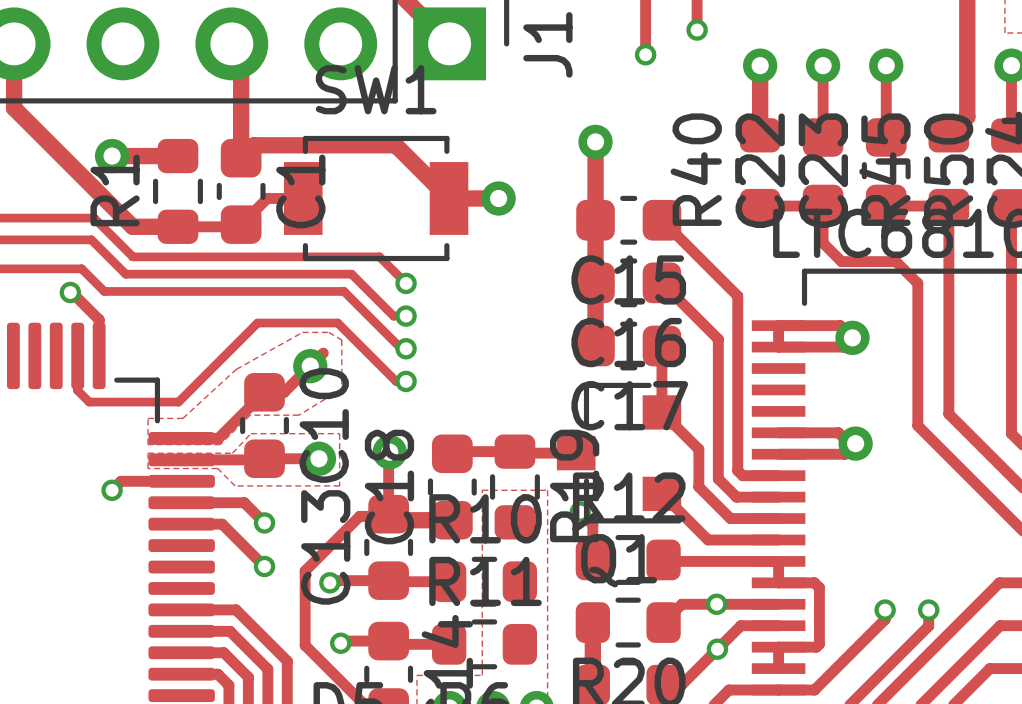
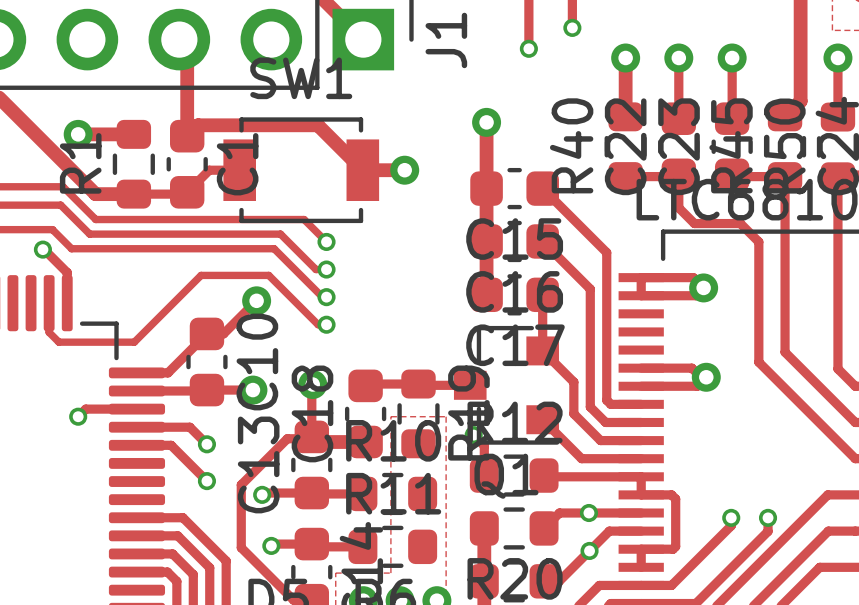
zone outline: (302, 332) (236, 369) (182, 418) (148, 418) (148, 444) (220, 444) (250, 415) (298, 415) (341, 389) (341, 340) (328, 332) (302, 332) -> none
via position: (310, 366) -> (256, 300)
zone outline: (250, 433) (232, 453) (148, 453) (148, 468) (217, 468) (235, 485) (339, 485) (339, 433) (250, 433) -> none

